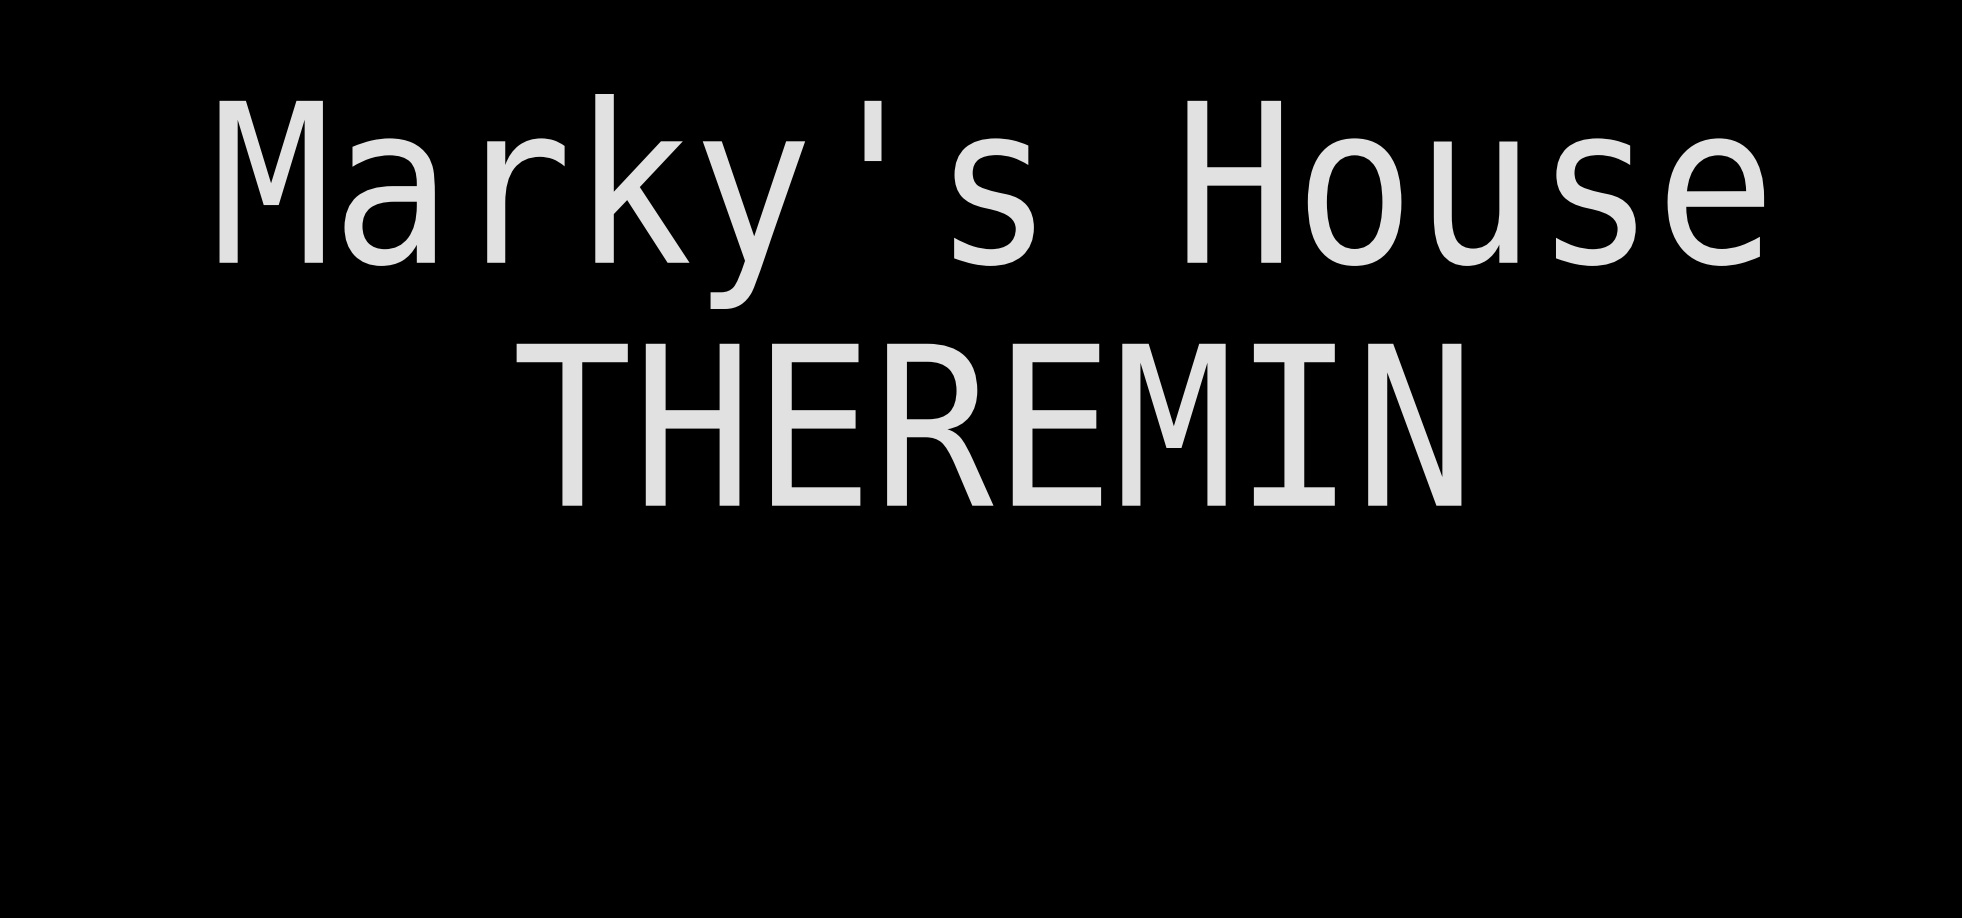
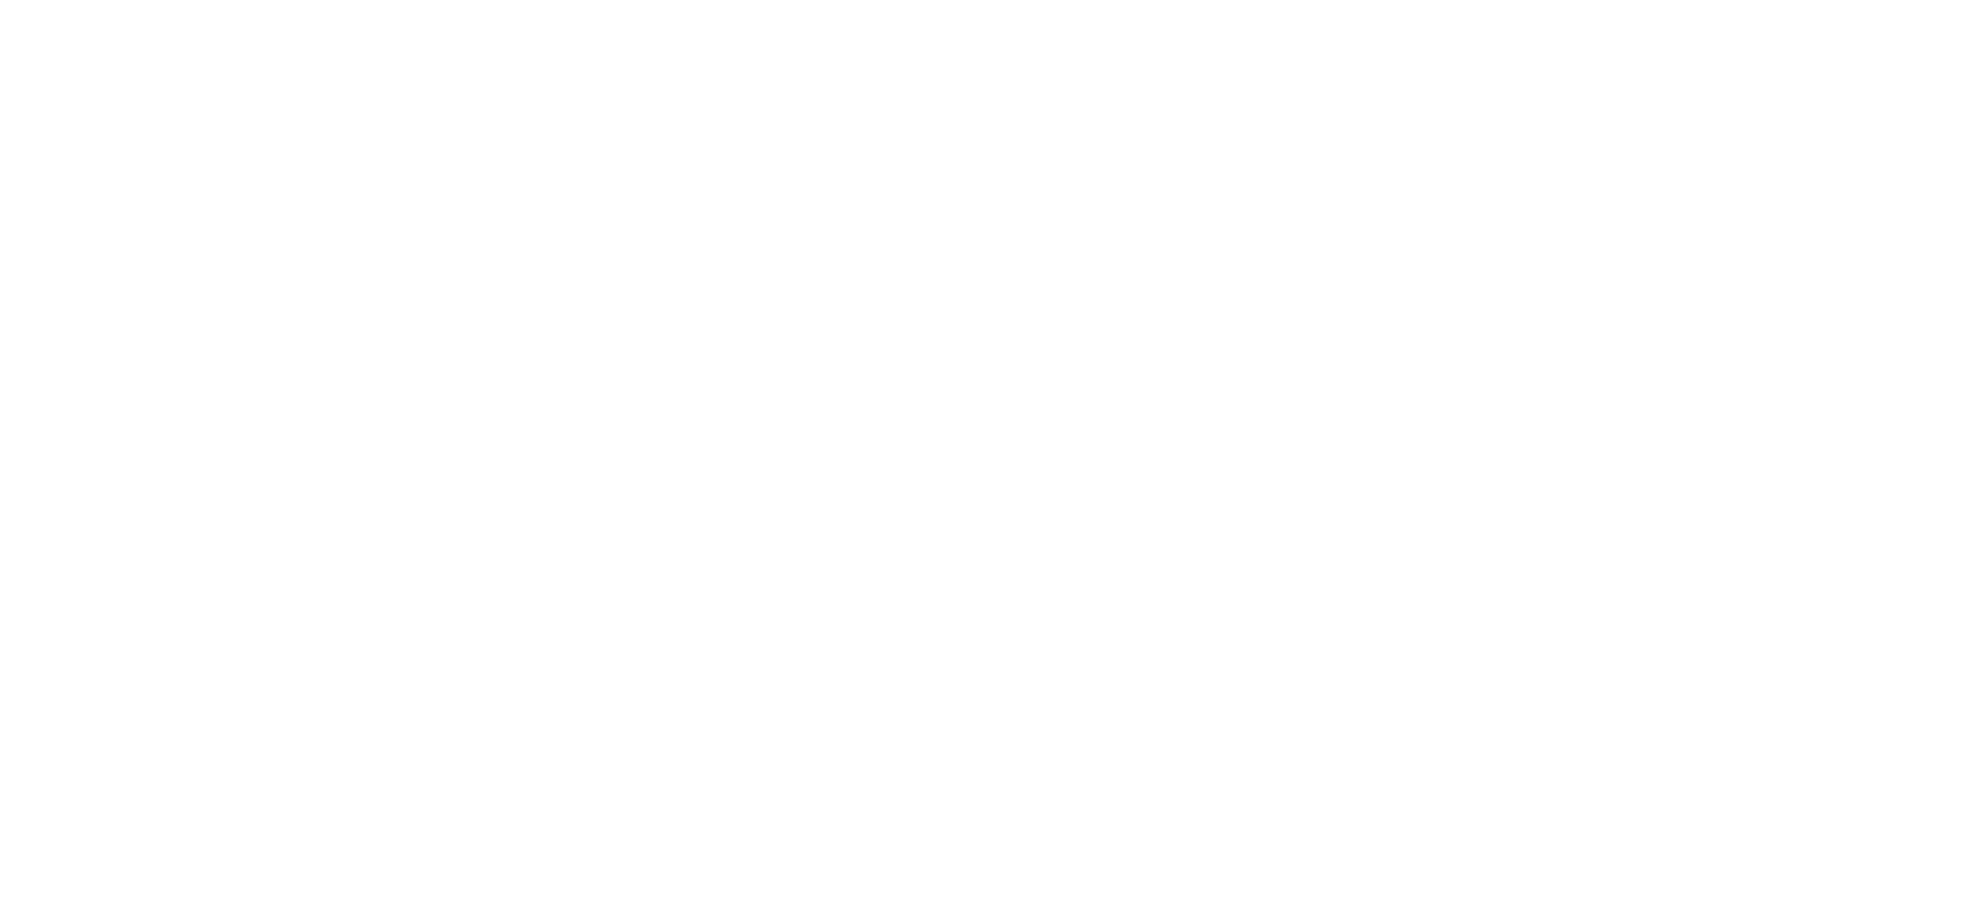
text: Marky's House (991, 201) -> none
text: THEREMIN (989, 424) -> none

